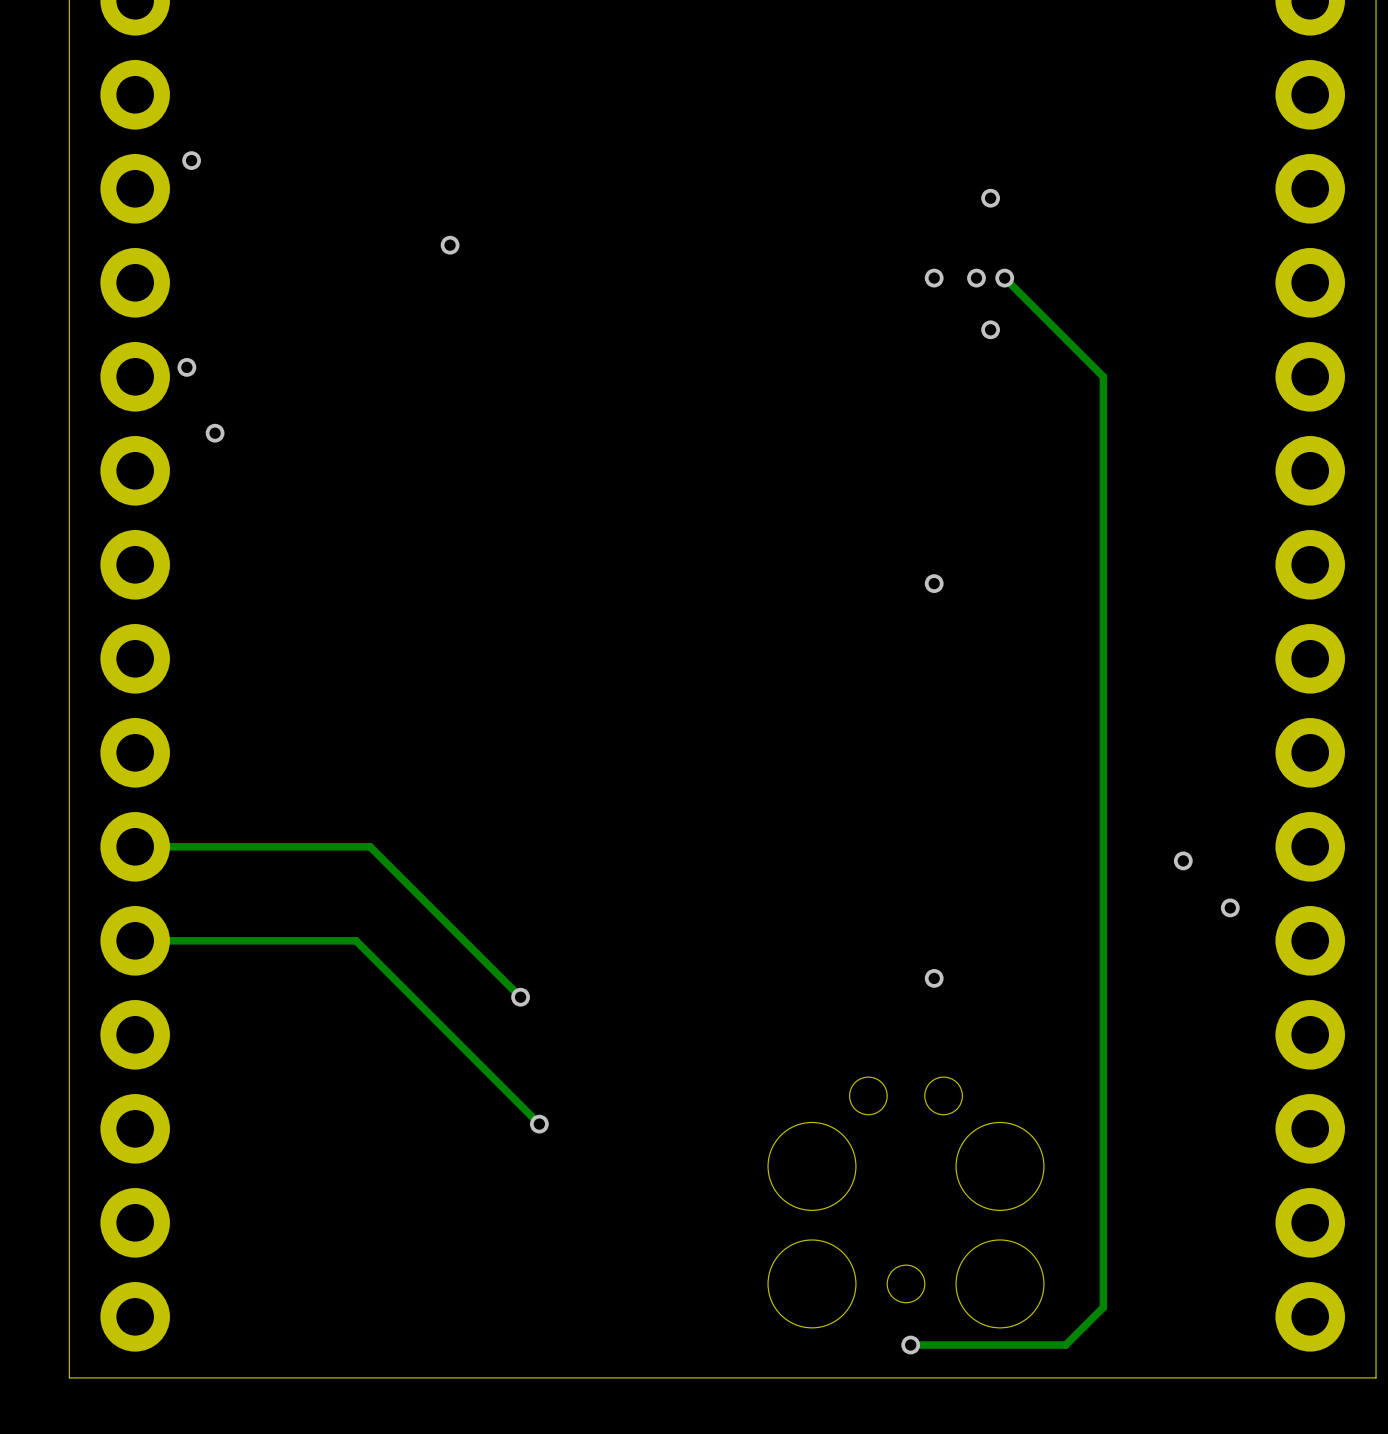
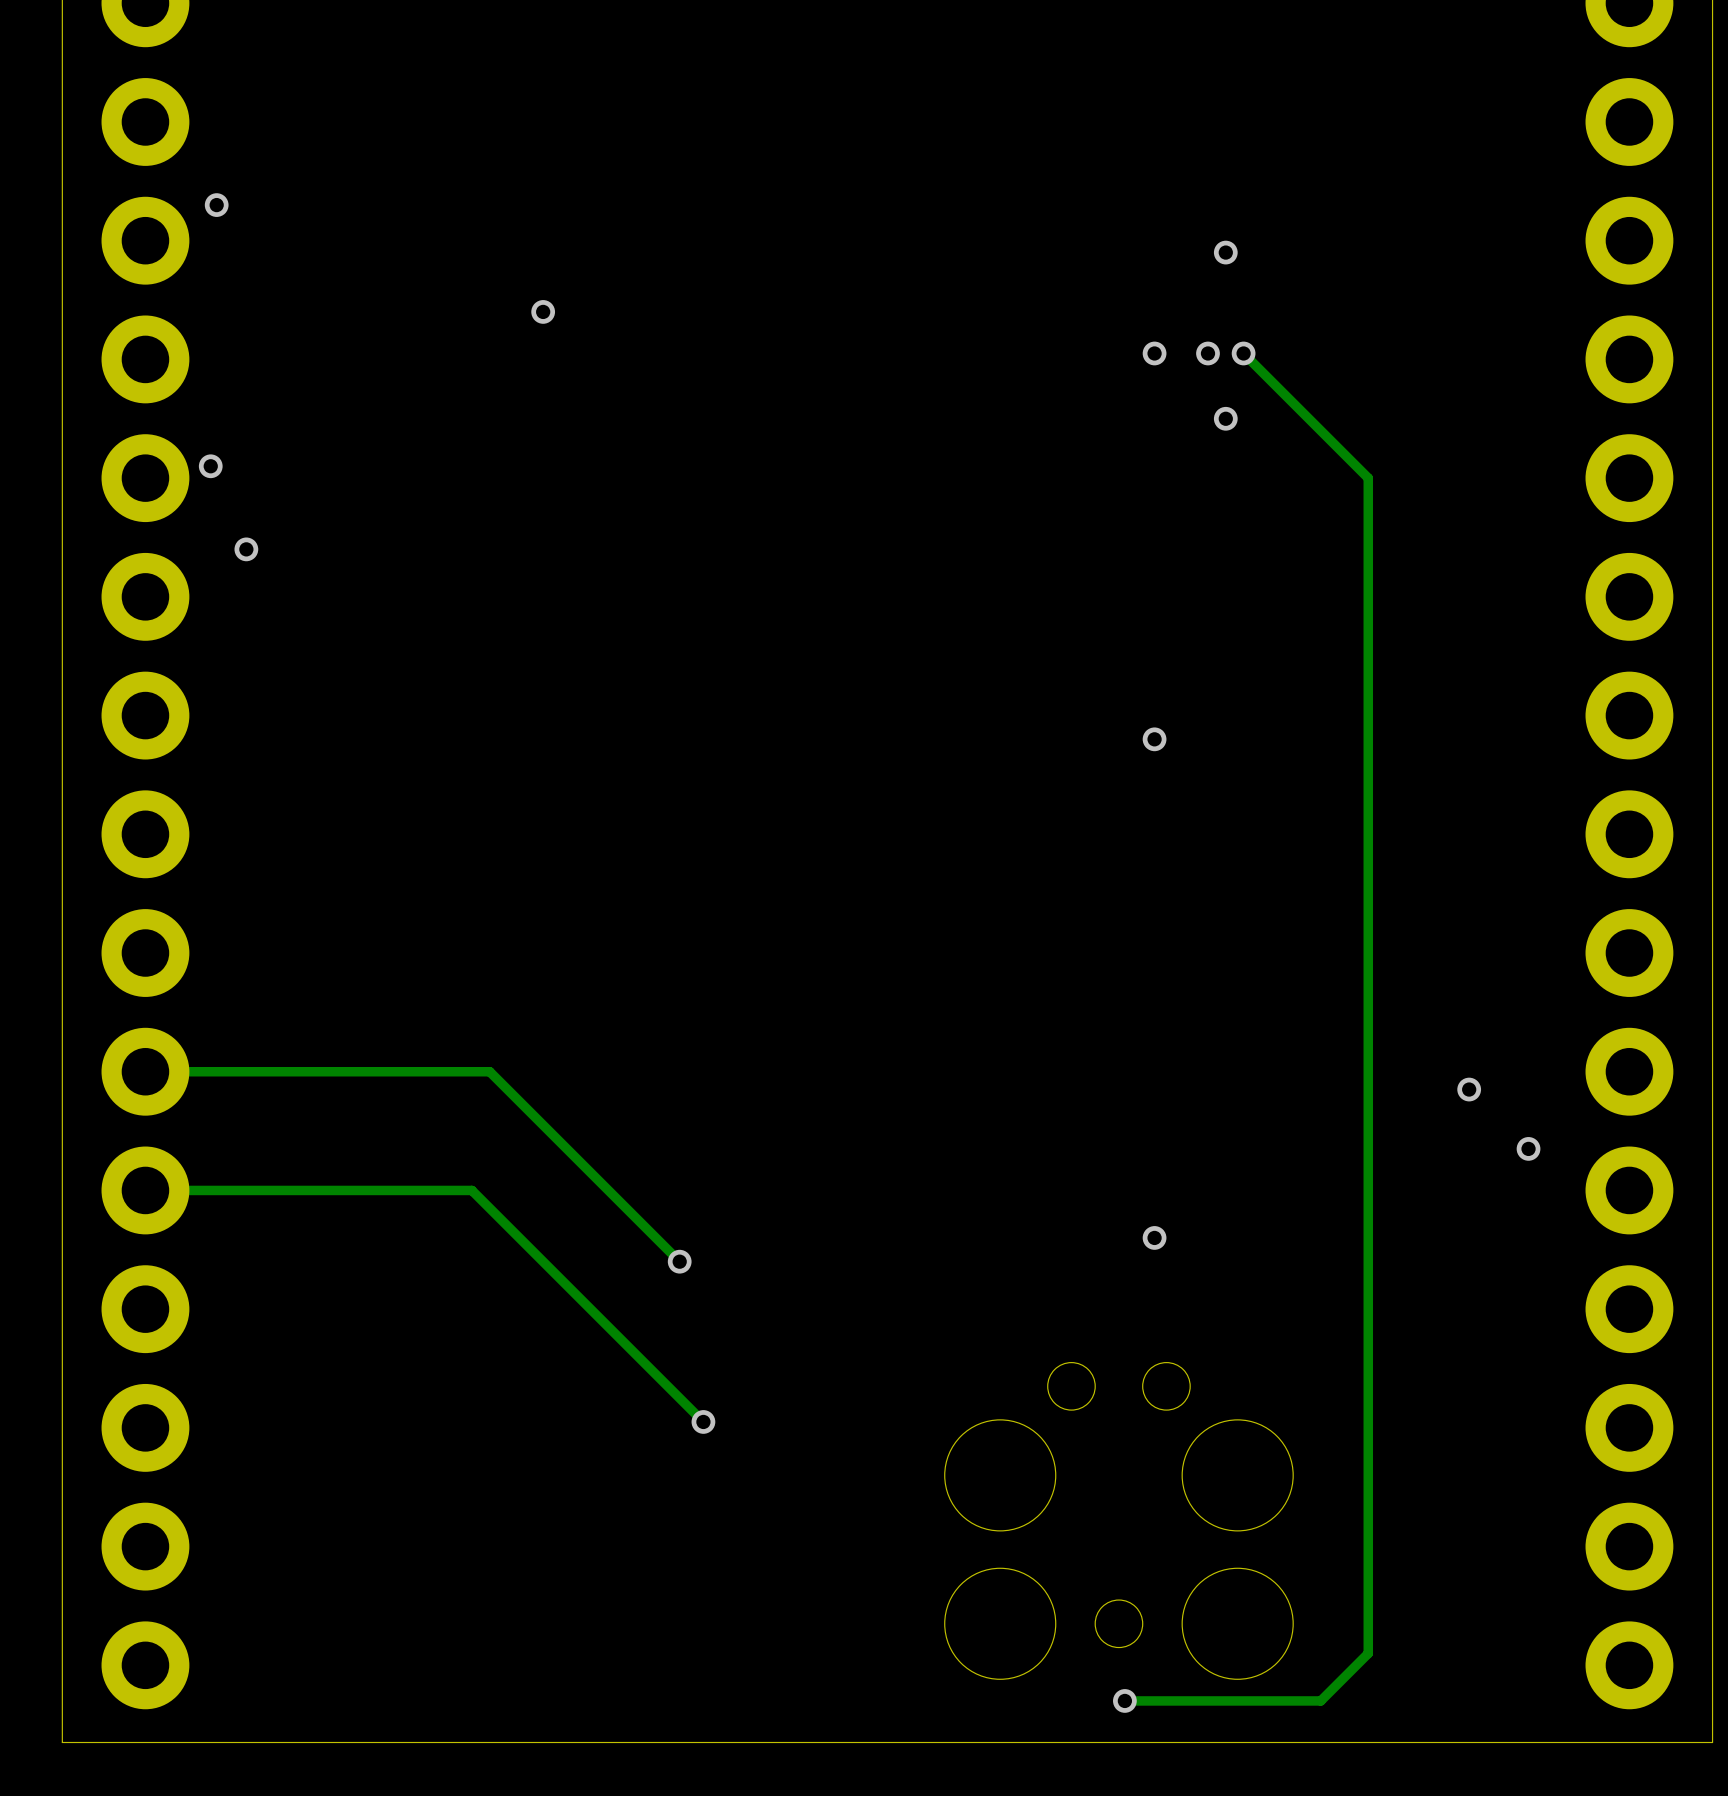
track: (370, 846) (520, 997) -> (442, 1071) (489, 1071) (679, 1261)
track: (356, 940) (539, 1124) -> (424, 1190) (471, 1190) (703, 1421)
via position: (520, 997) -> (679, 1261)
via position: (539, 1124) -> (703, 1421)

